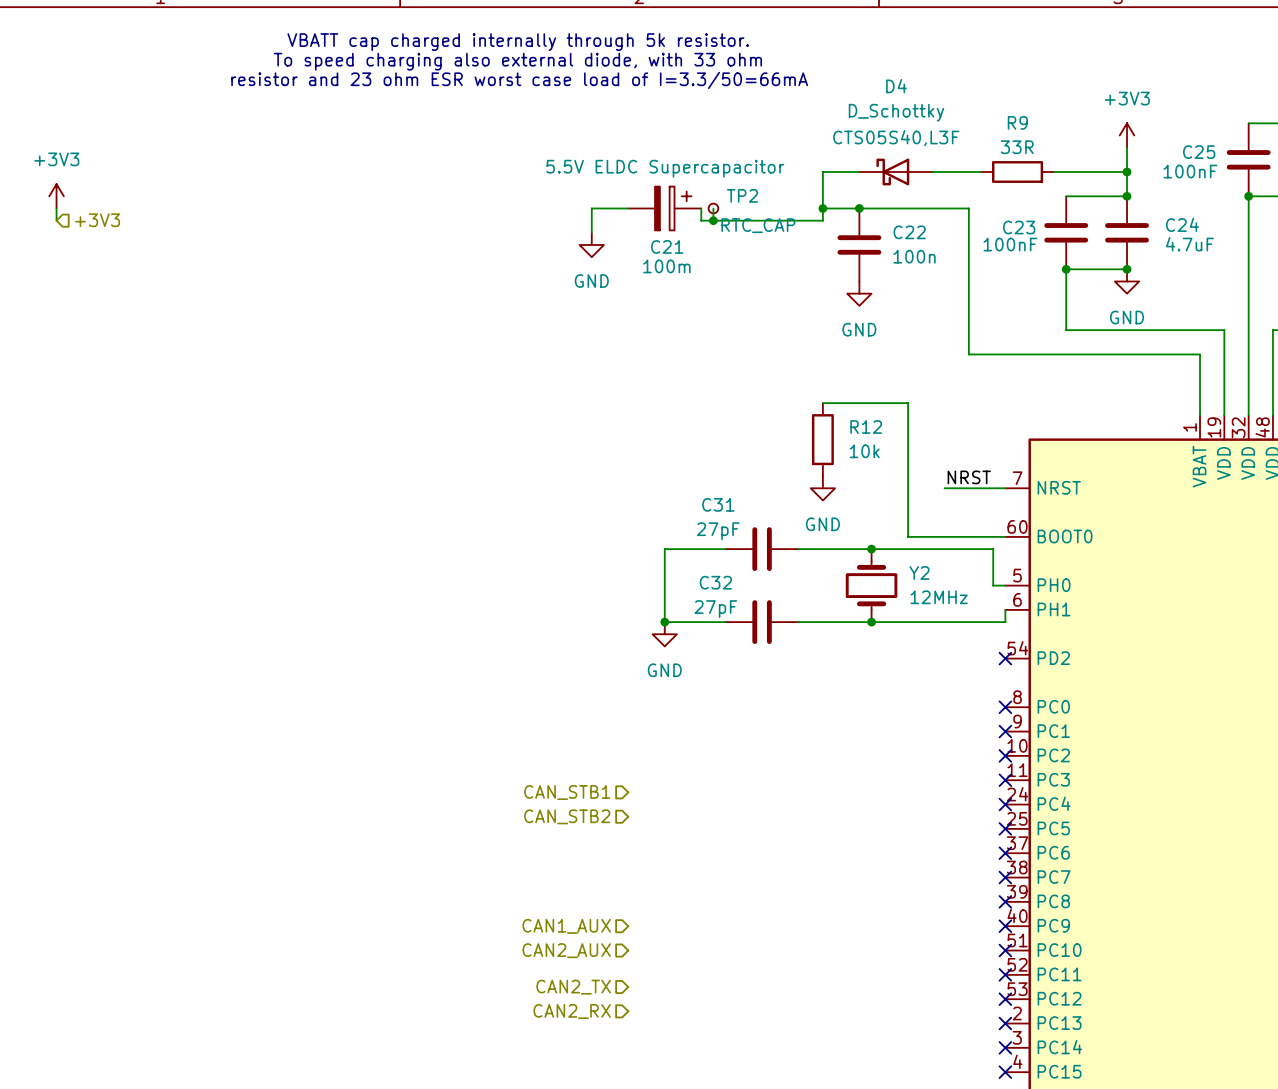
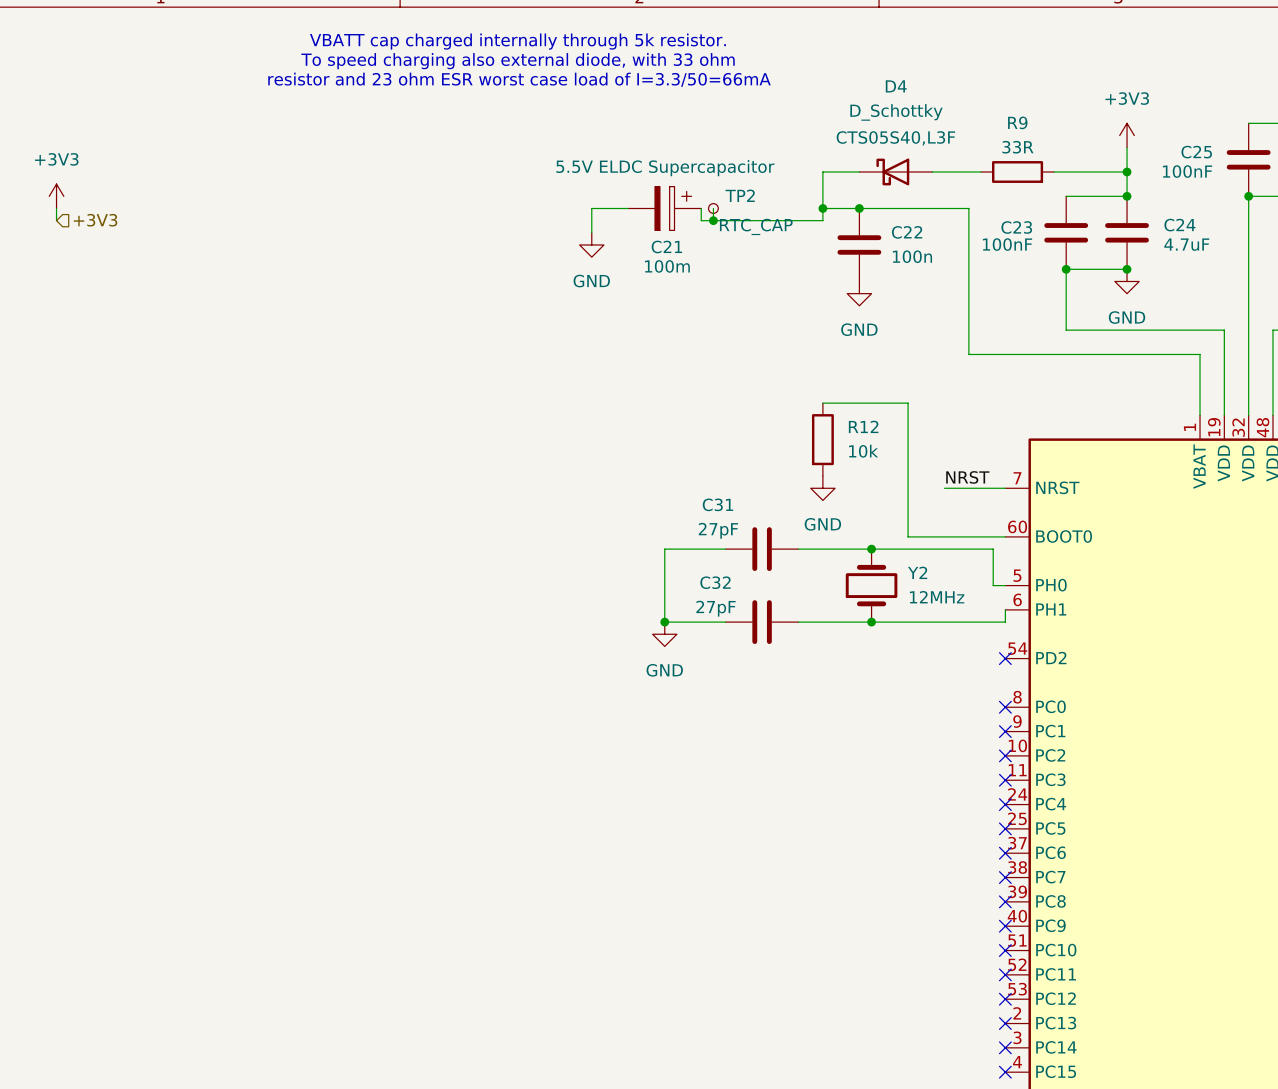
hierarchical label: CAN_STB1 (567, 792) -> none
hierarchical label: CAN_STB2 (567, 816) -> none
hierarchical label: CAN1_AUX (566, 926) -> none
hierarchical label: CAN2_AUX (566, 950) -> none
hierarchical label: CAN2_TX (573, 987) -> none
hierarchical label: CAN2_RX (572, 1011) -> none

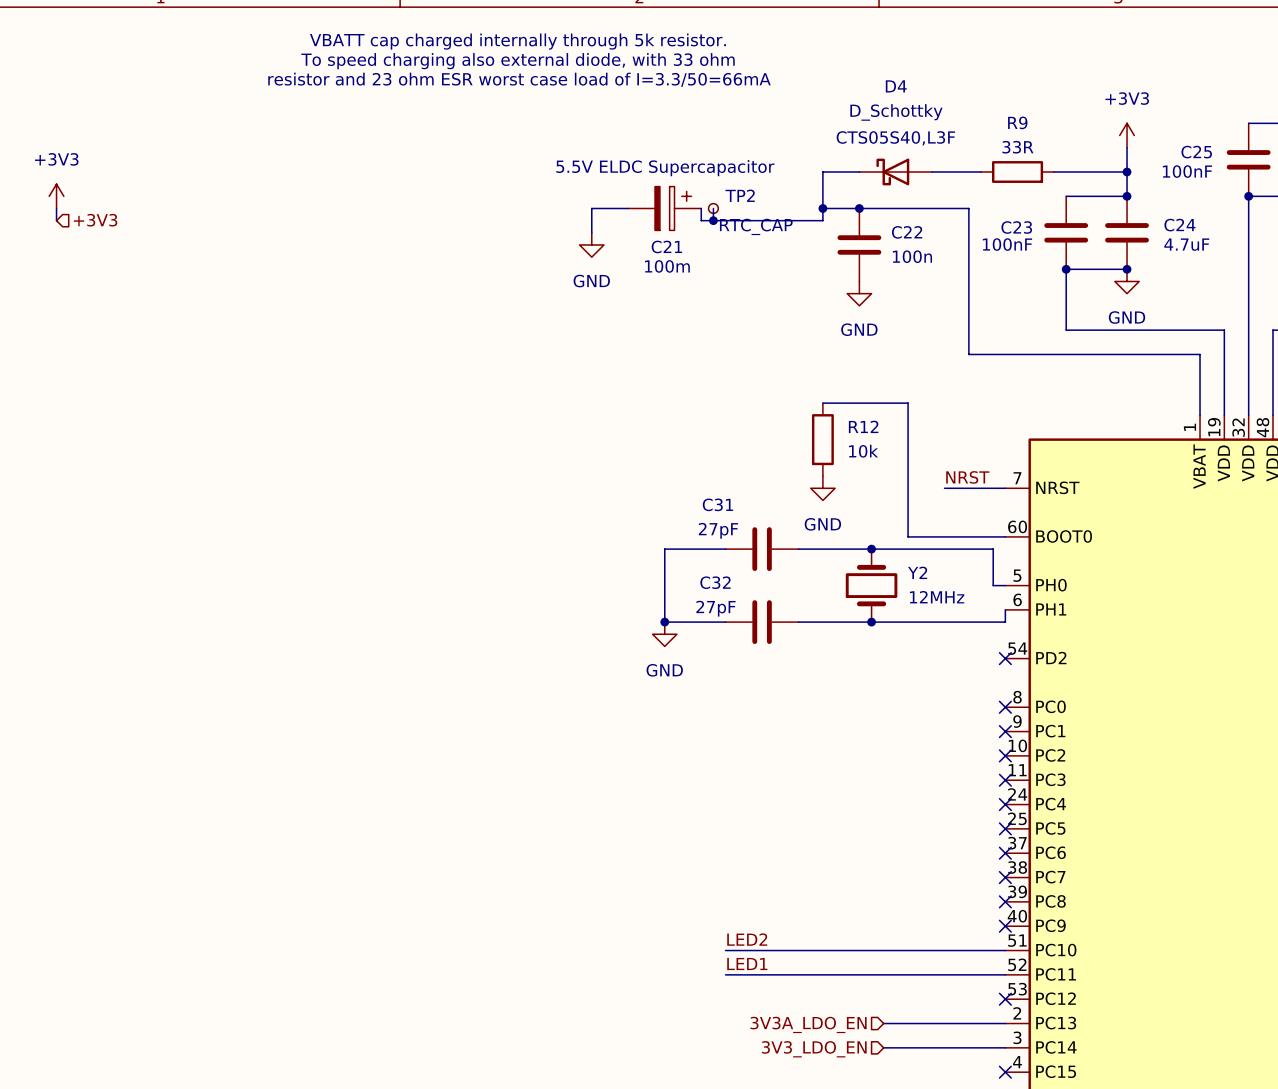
label: none -> LED2 (747, 939)
wire: none -> (725, 950) (1005, 950)
no-connect mark: (1005, 950) -> none
label: none -> LED1 (747, 964)
wire: none -> (725, 974) (1005, 974)
no-connect mark: (1005, 974) -> none
wire: none -> (883, 1023) (1005, 1023)
no-connect mark: (1005, 1023) -> none
hierarchical label: none -> 3V3A_LDO_EN (808, 1024)
wire: none -> (883, 1047) (1005, 1047)
no-connect mark: (1005, 1047) -> none
hierarchical label: none -> 3V3_LDO_EN (814, 1049)

